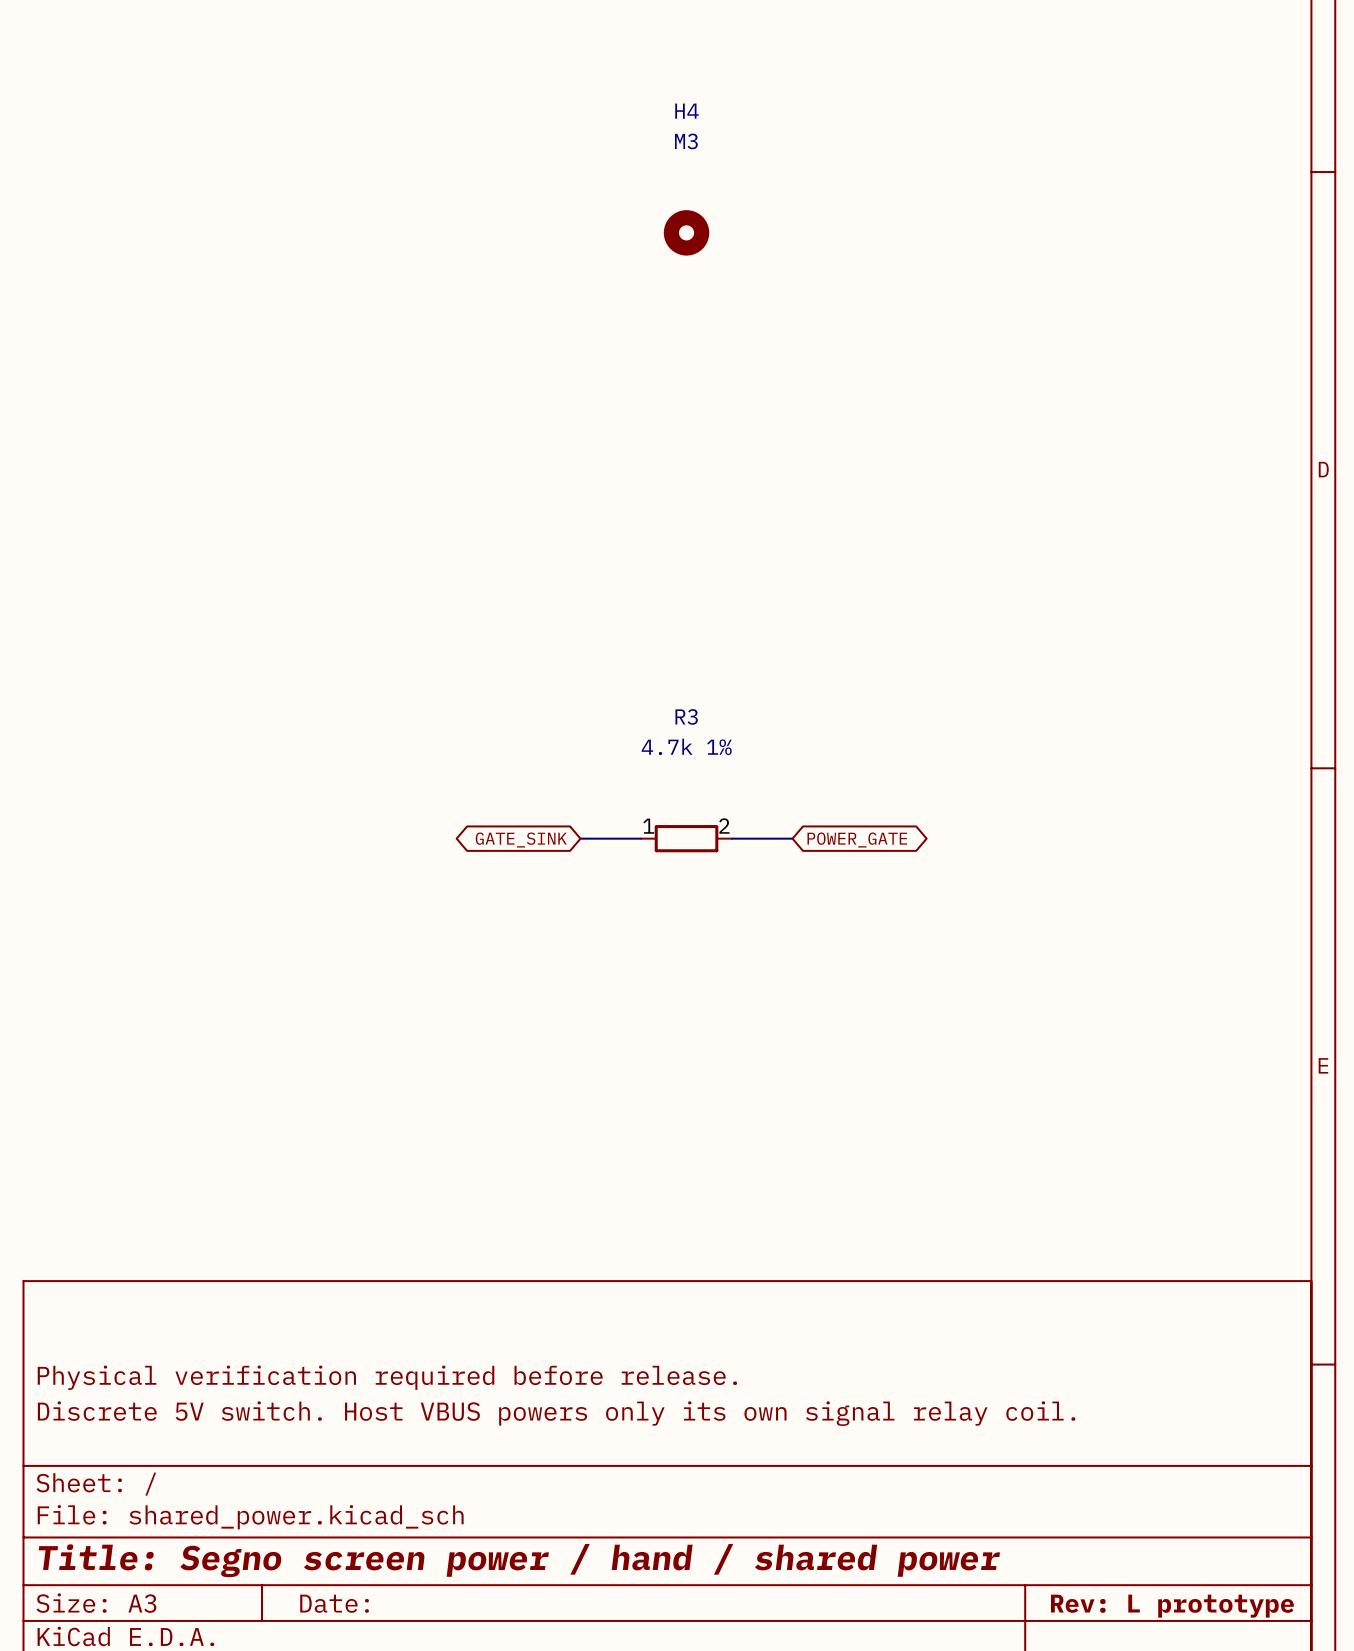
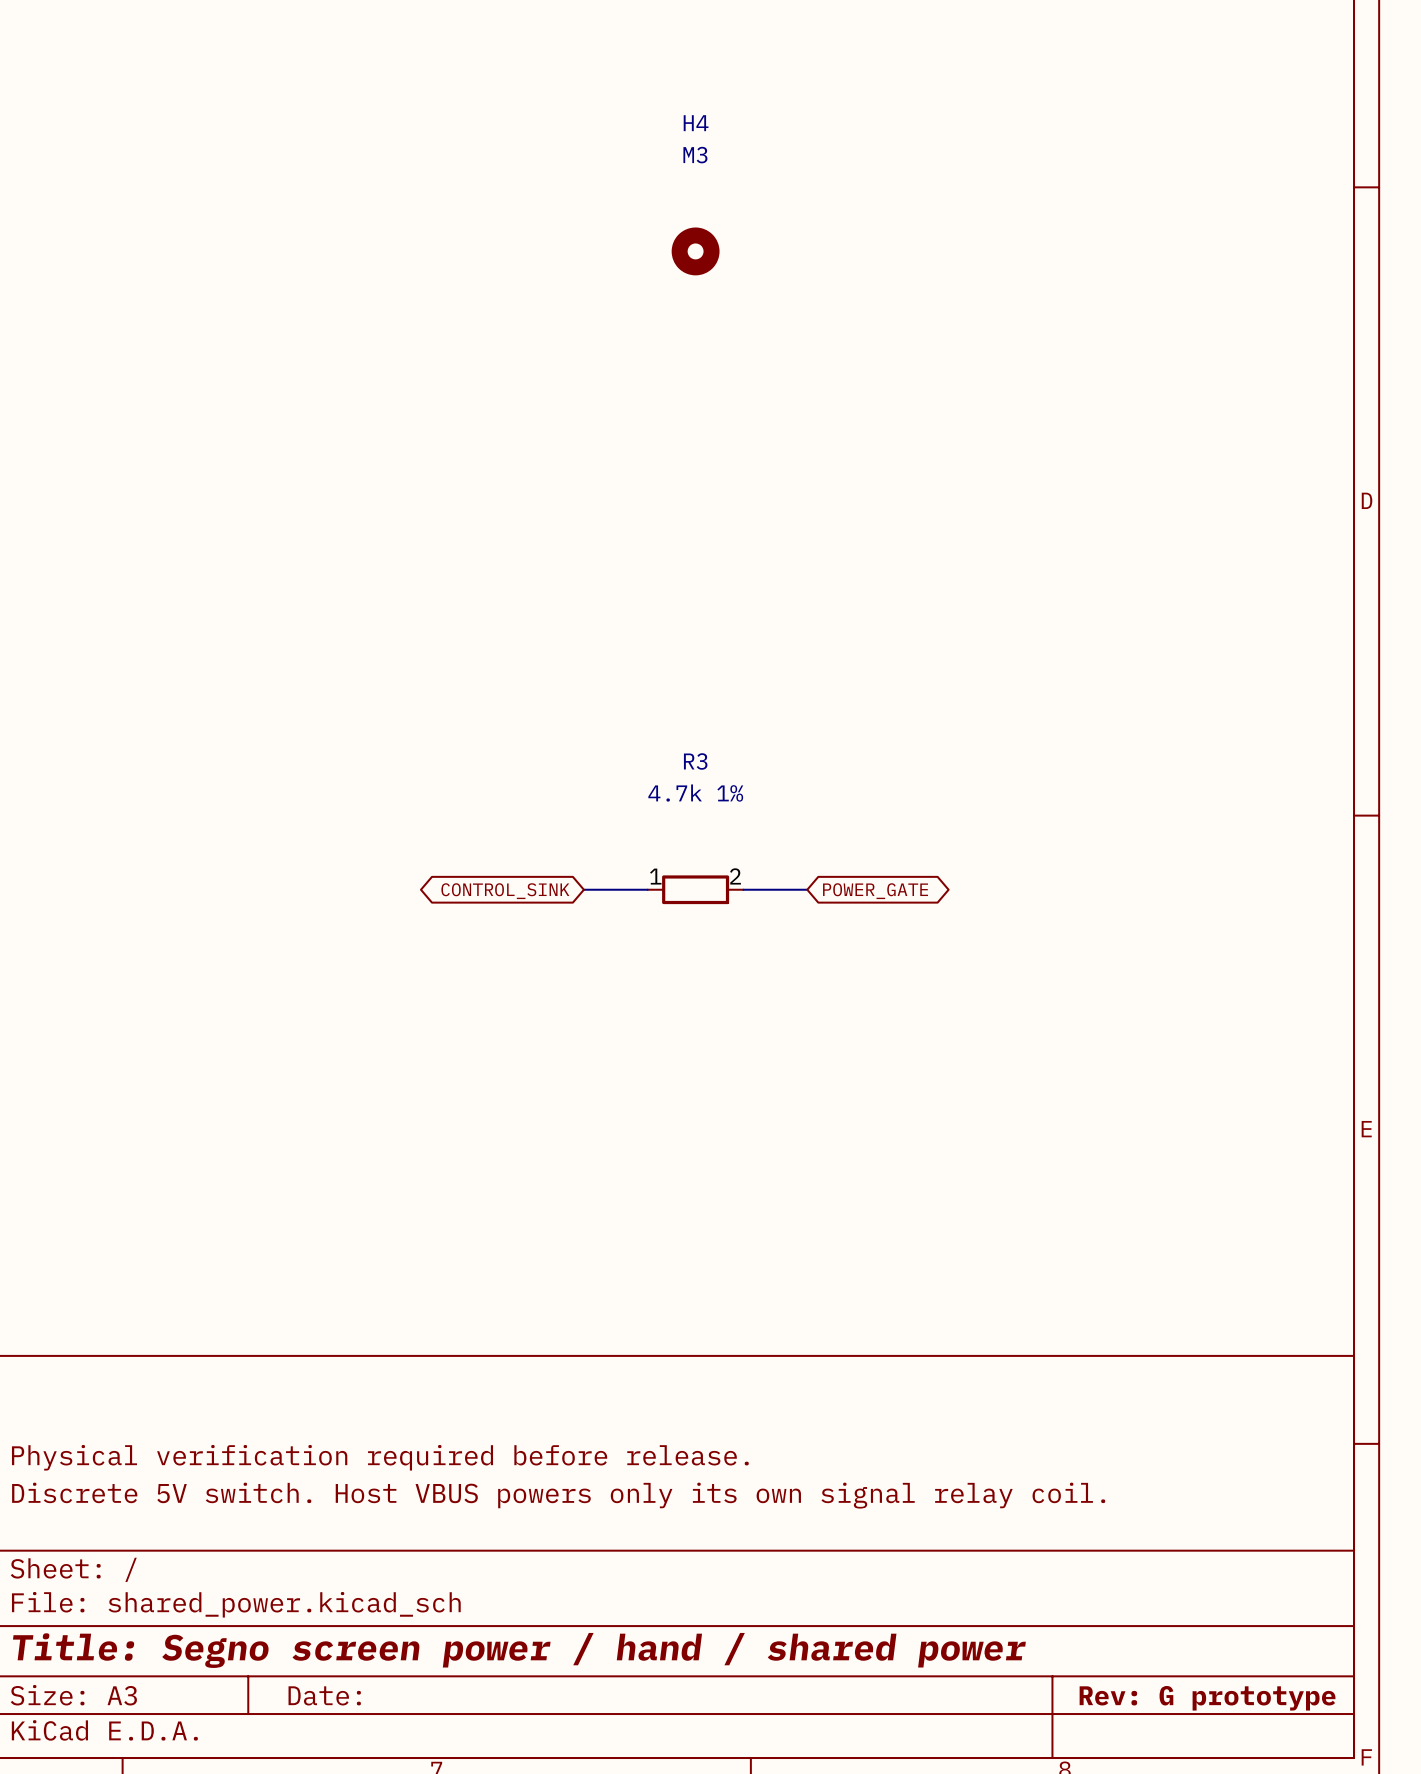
global label: GATE_SINK (521, 840) -> CONTROL_SINK (505, 891)
title block: Rev: L prototype (1172, 1606) -> Rev: G prototype (1207, 1698)

